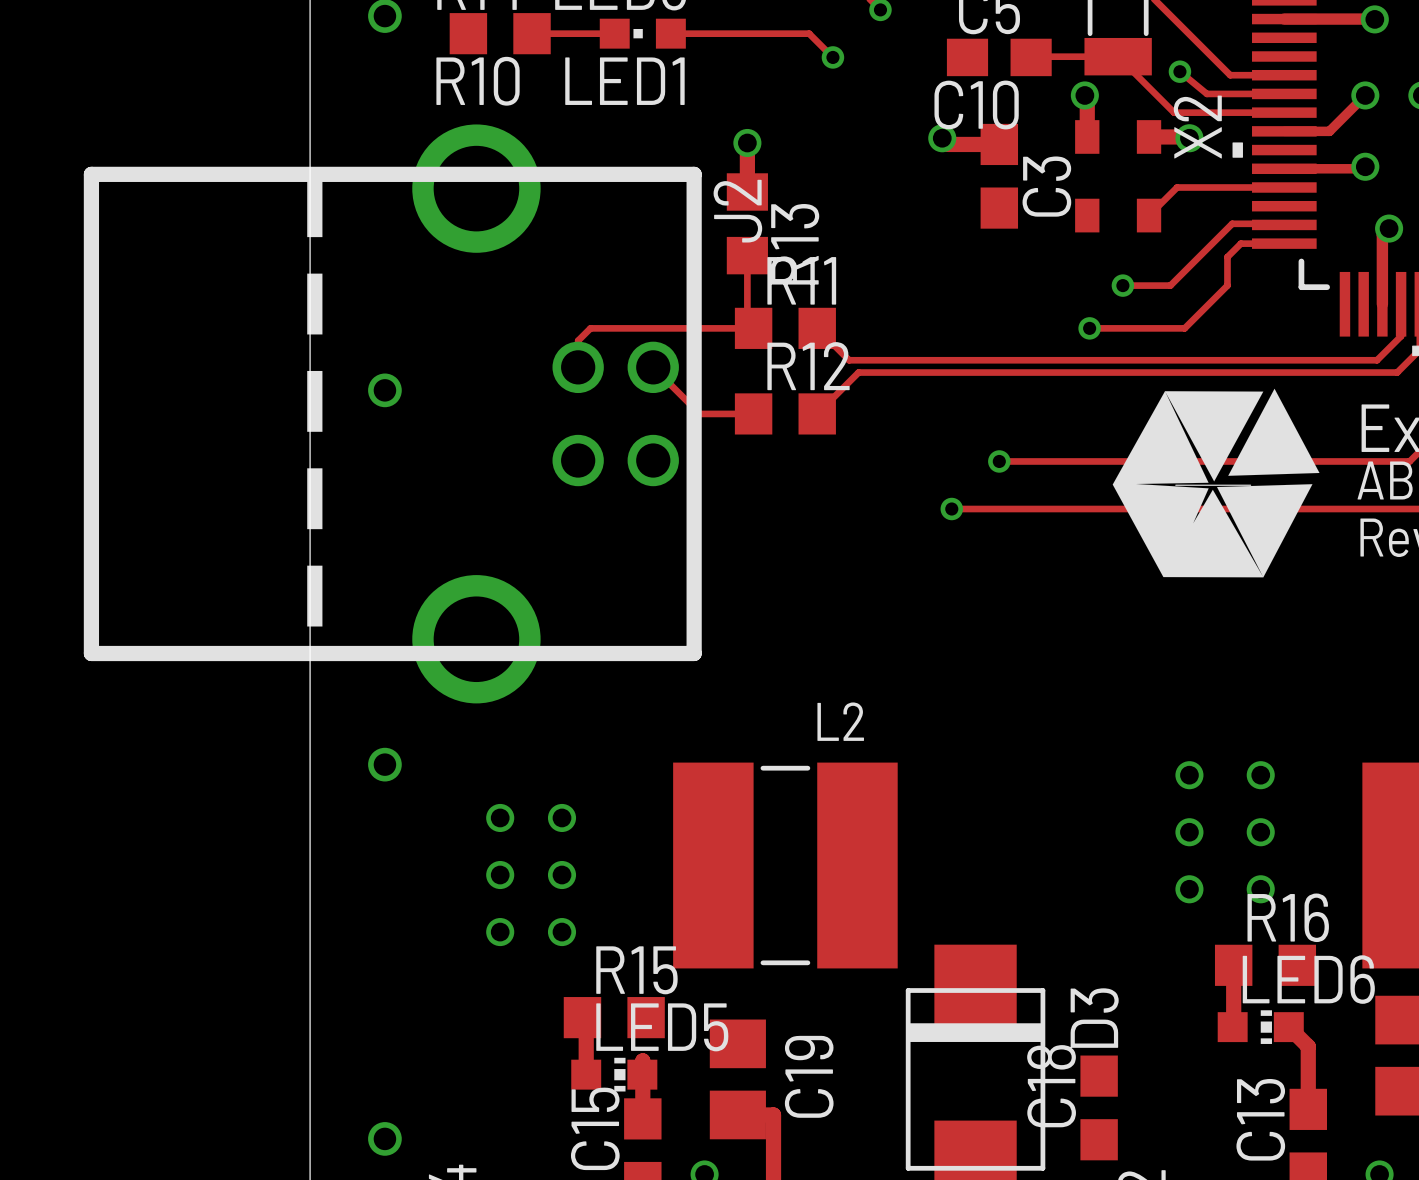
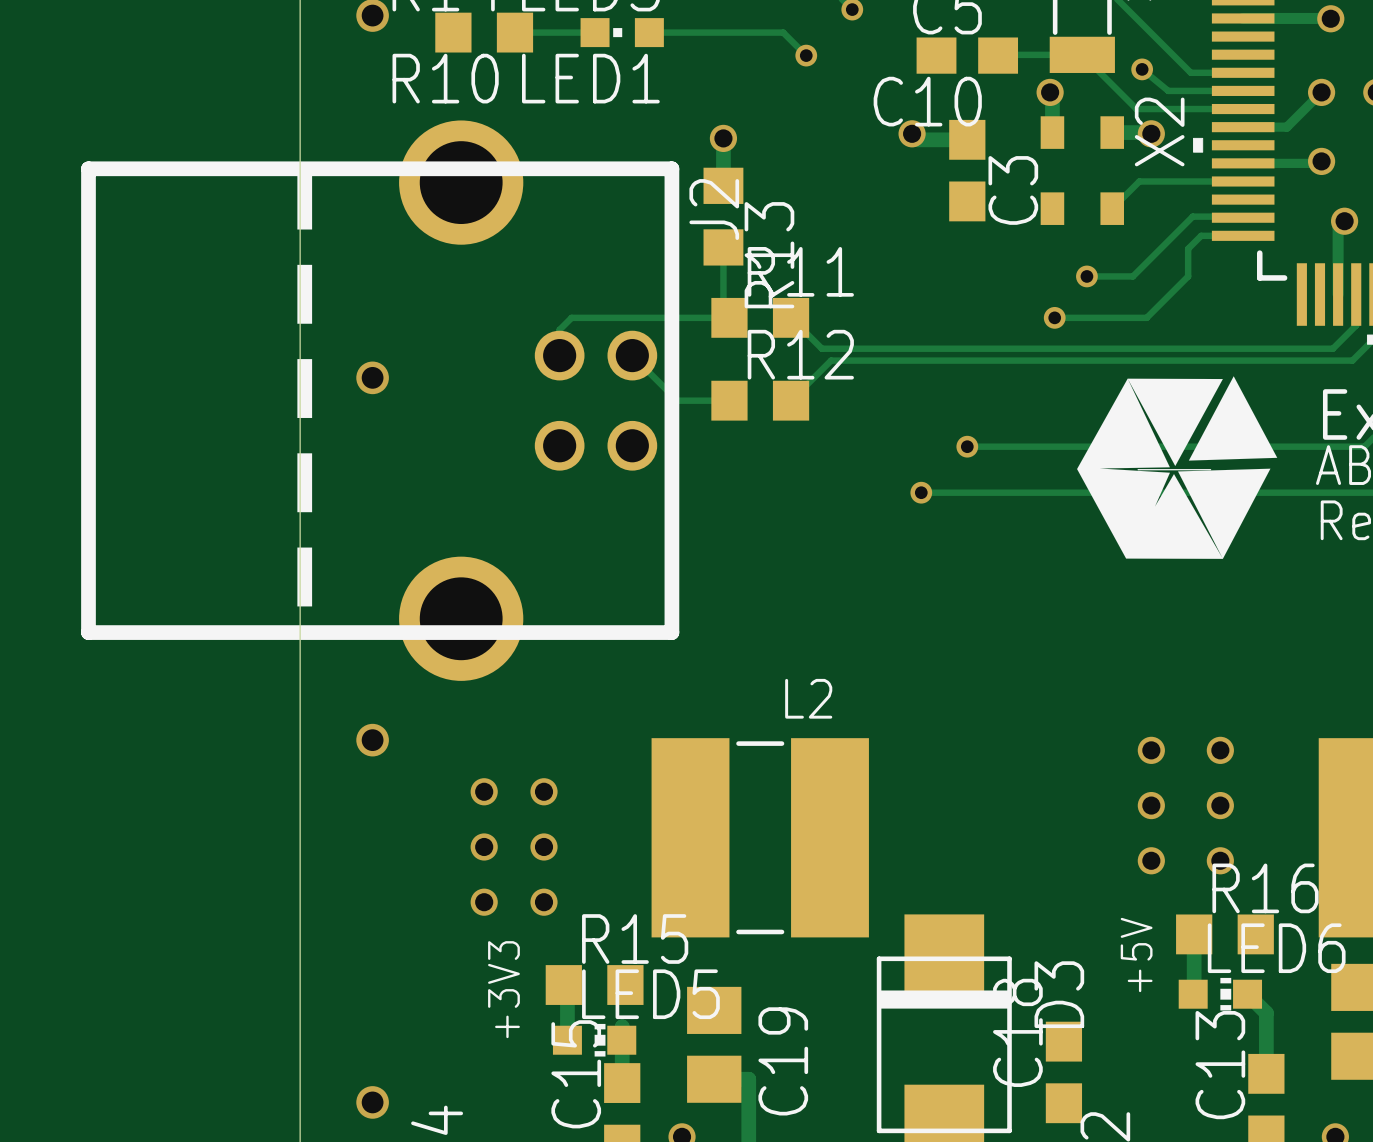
text: none -> +5V (1136, 954)
text: none -> +3V3 (503, 989)

